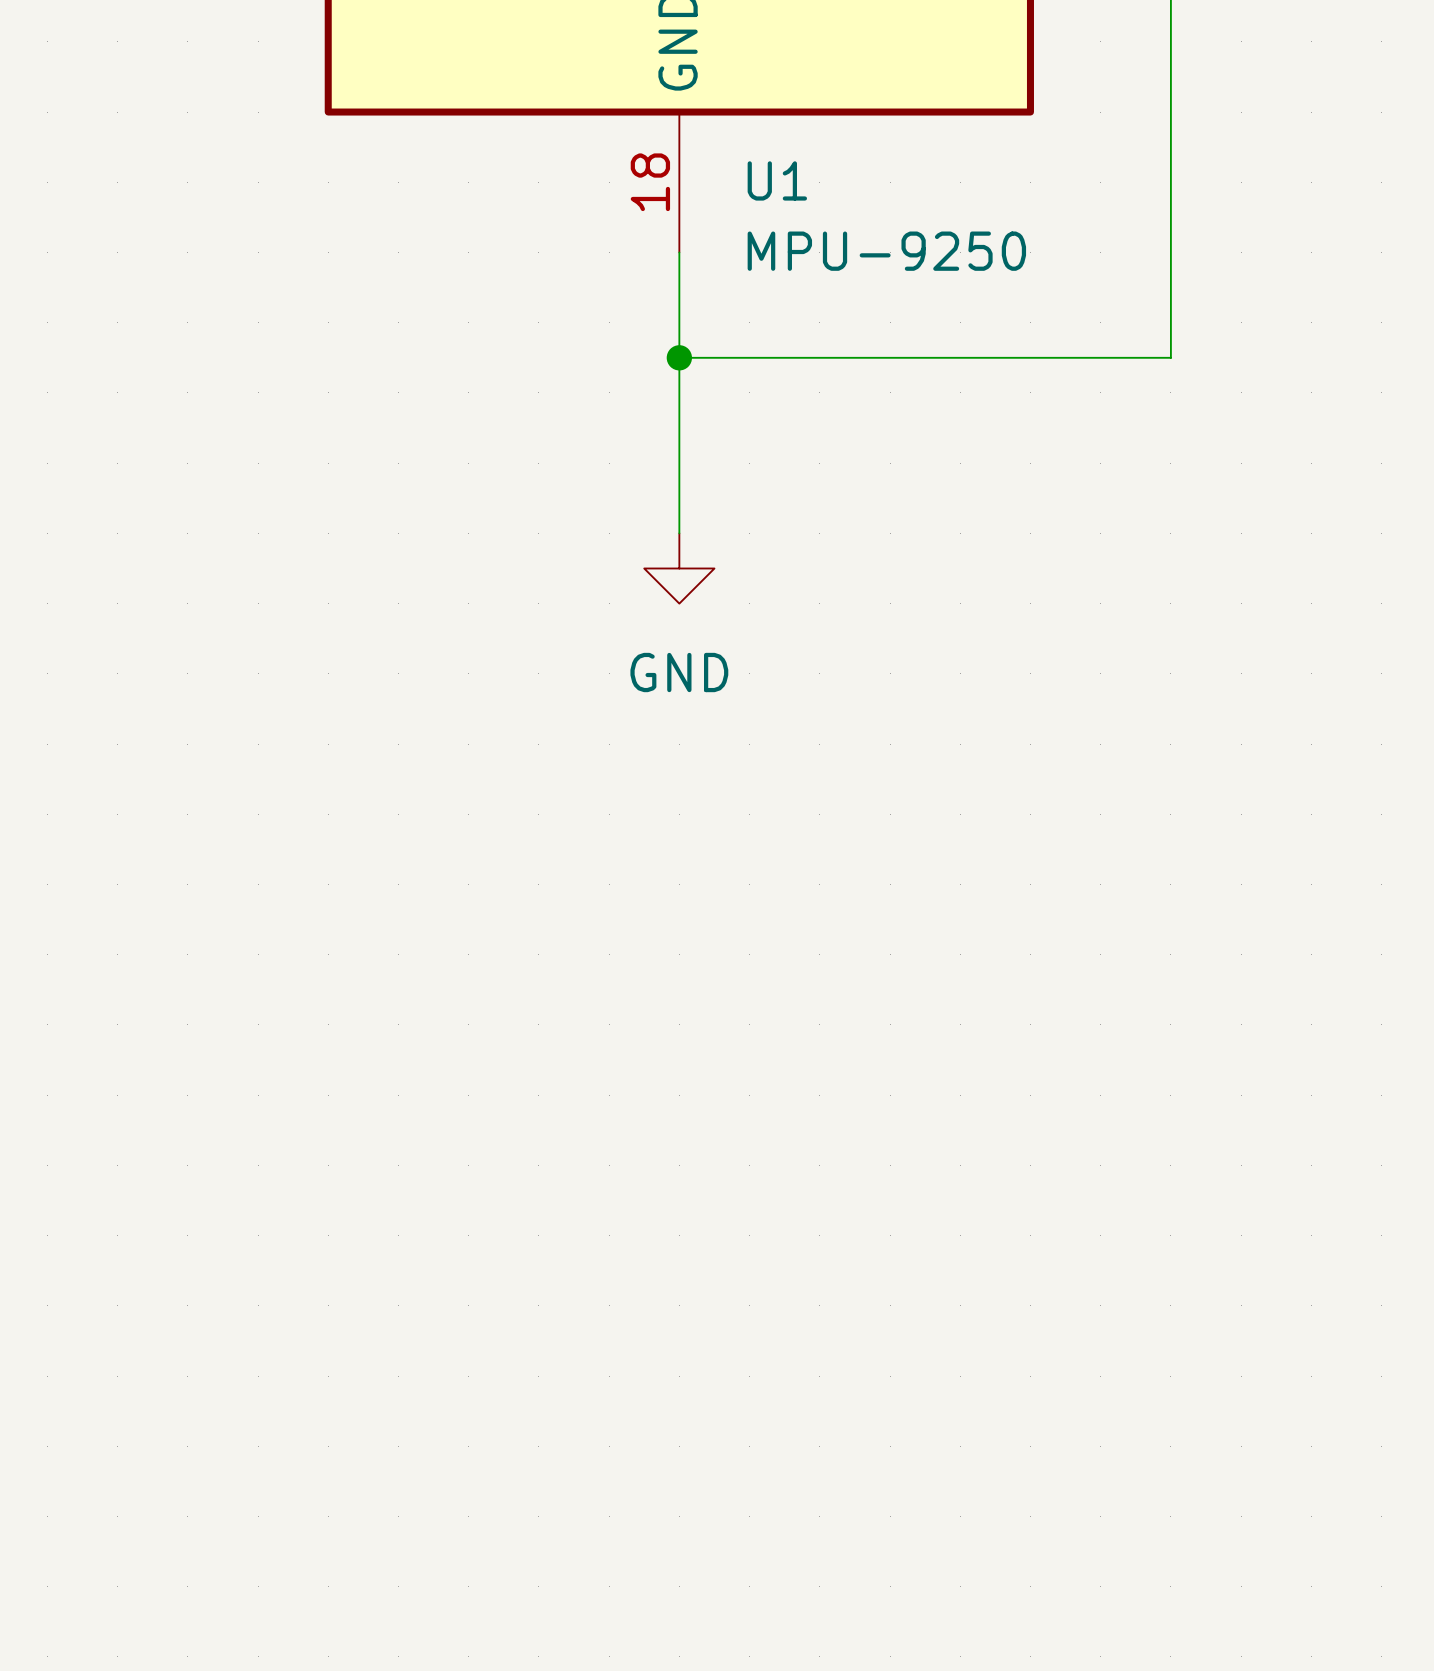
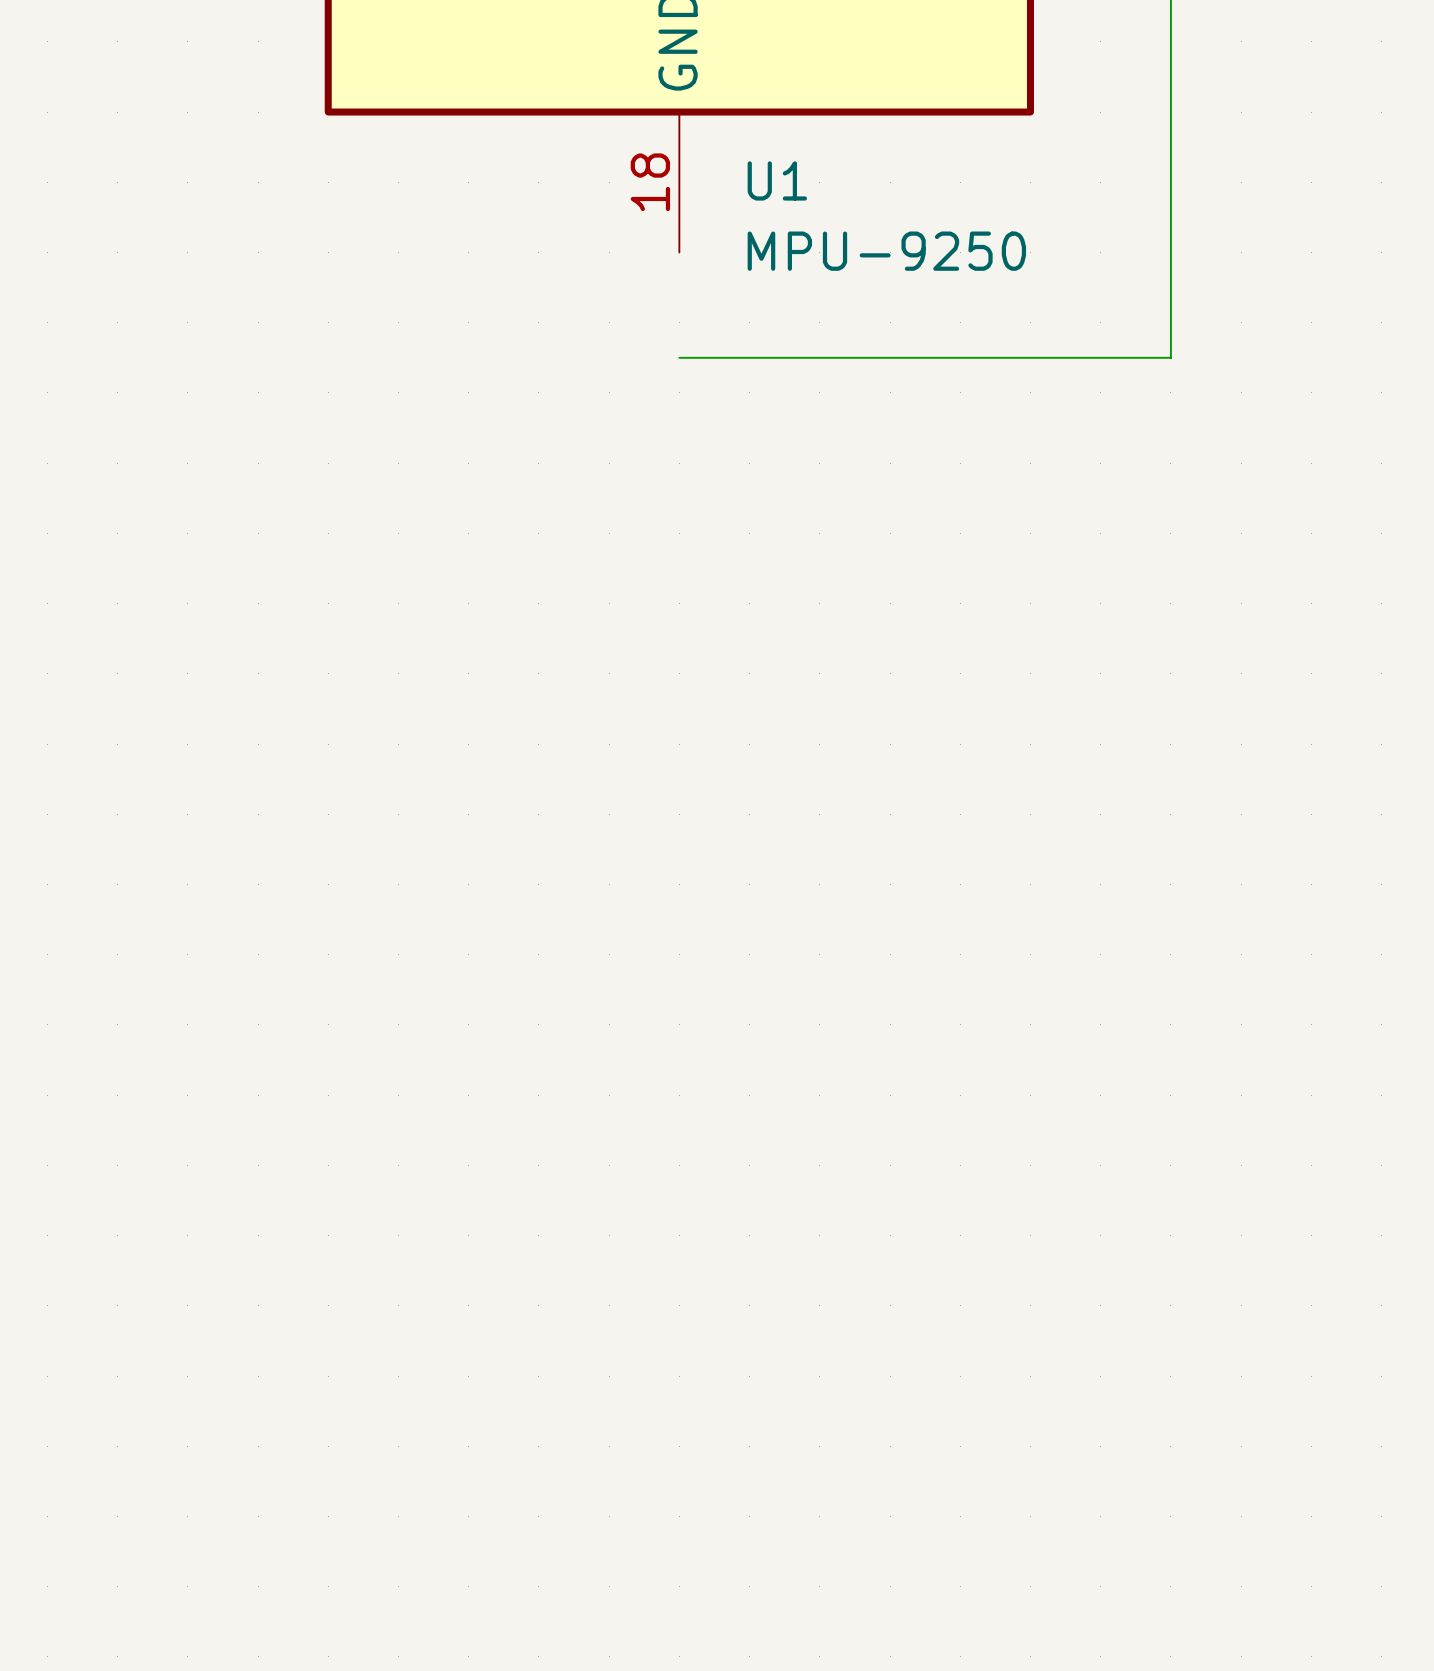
wire: (679, 252) (679, 533) -> none
junction: (679, 357) -> none
power symbol: GND (679, 568) -> none

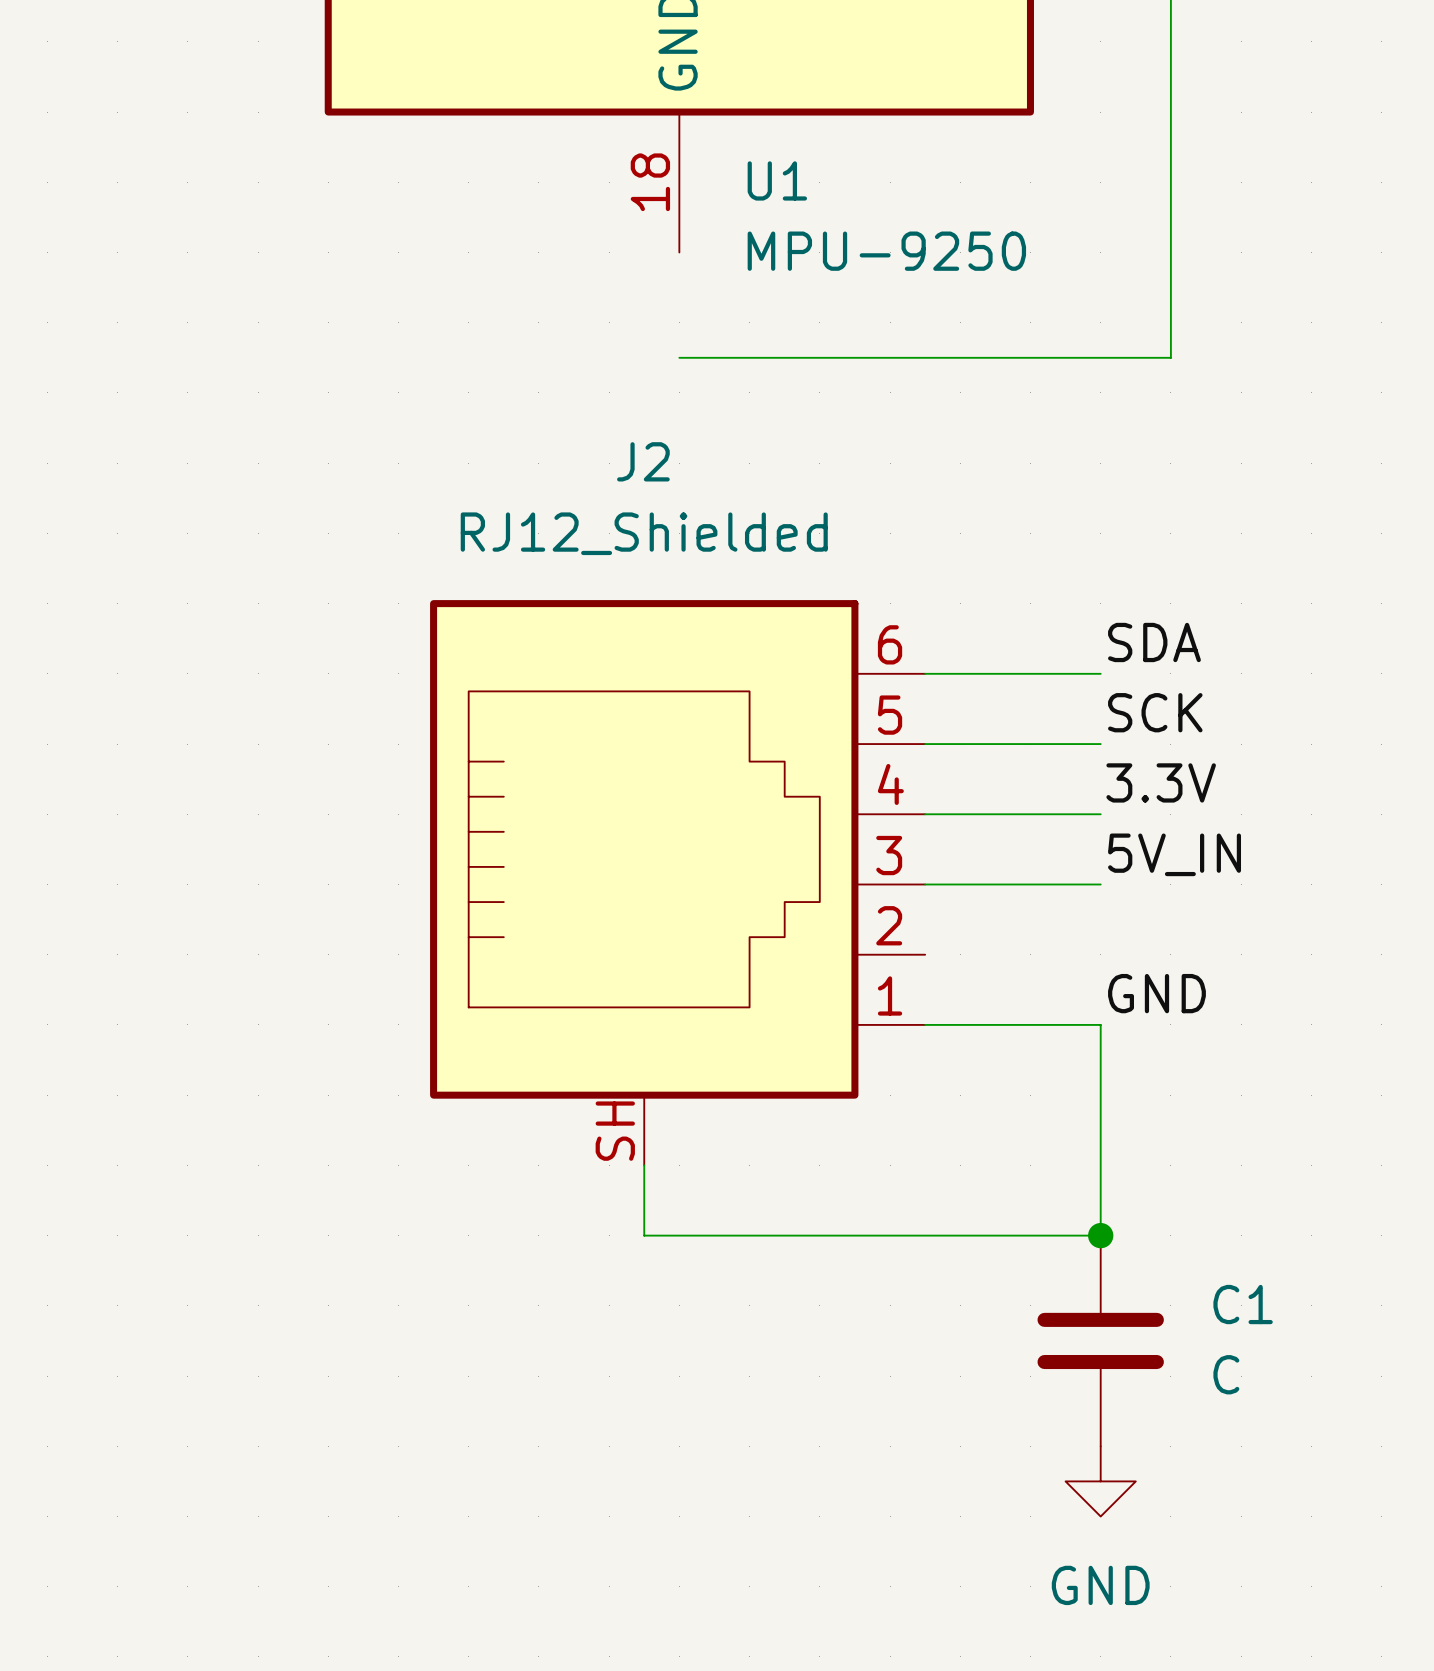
label: none -> SDA (1154, 642)
wire: none -> (925, 673) (1100, 673)
label: none -> SCK (1155, 712)
wire: none -> (925, 744) (1100, 744)
label: none -> 3.3V (1161, 782)
wire: none -> (925, 814) (1100, 814)
label: none -> 5V_IN (1174, 854)
J2: none -> RJ12_Shielded (677, 882)
wire: none -> (925, 884) (1100, 884)
label: none -> GND (1156, 993)
wire: none -> (925, 1024) (1100, 1024) (1100, 1235) (644, 1235) (644, 1165)
junction: none -> (1100, 1235)
C1: none -> C (1100, 1340)
power symbol: none -> GND (1100, 1481)

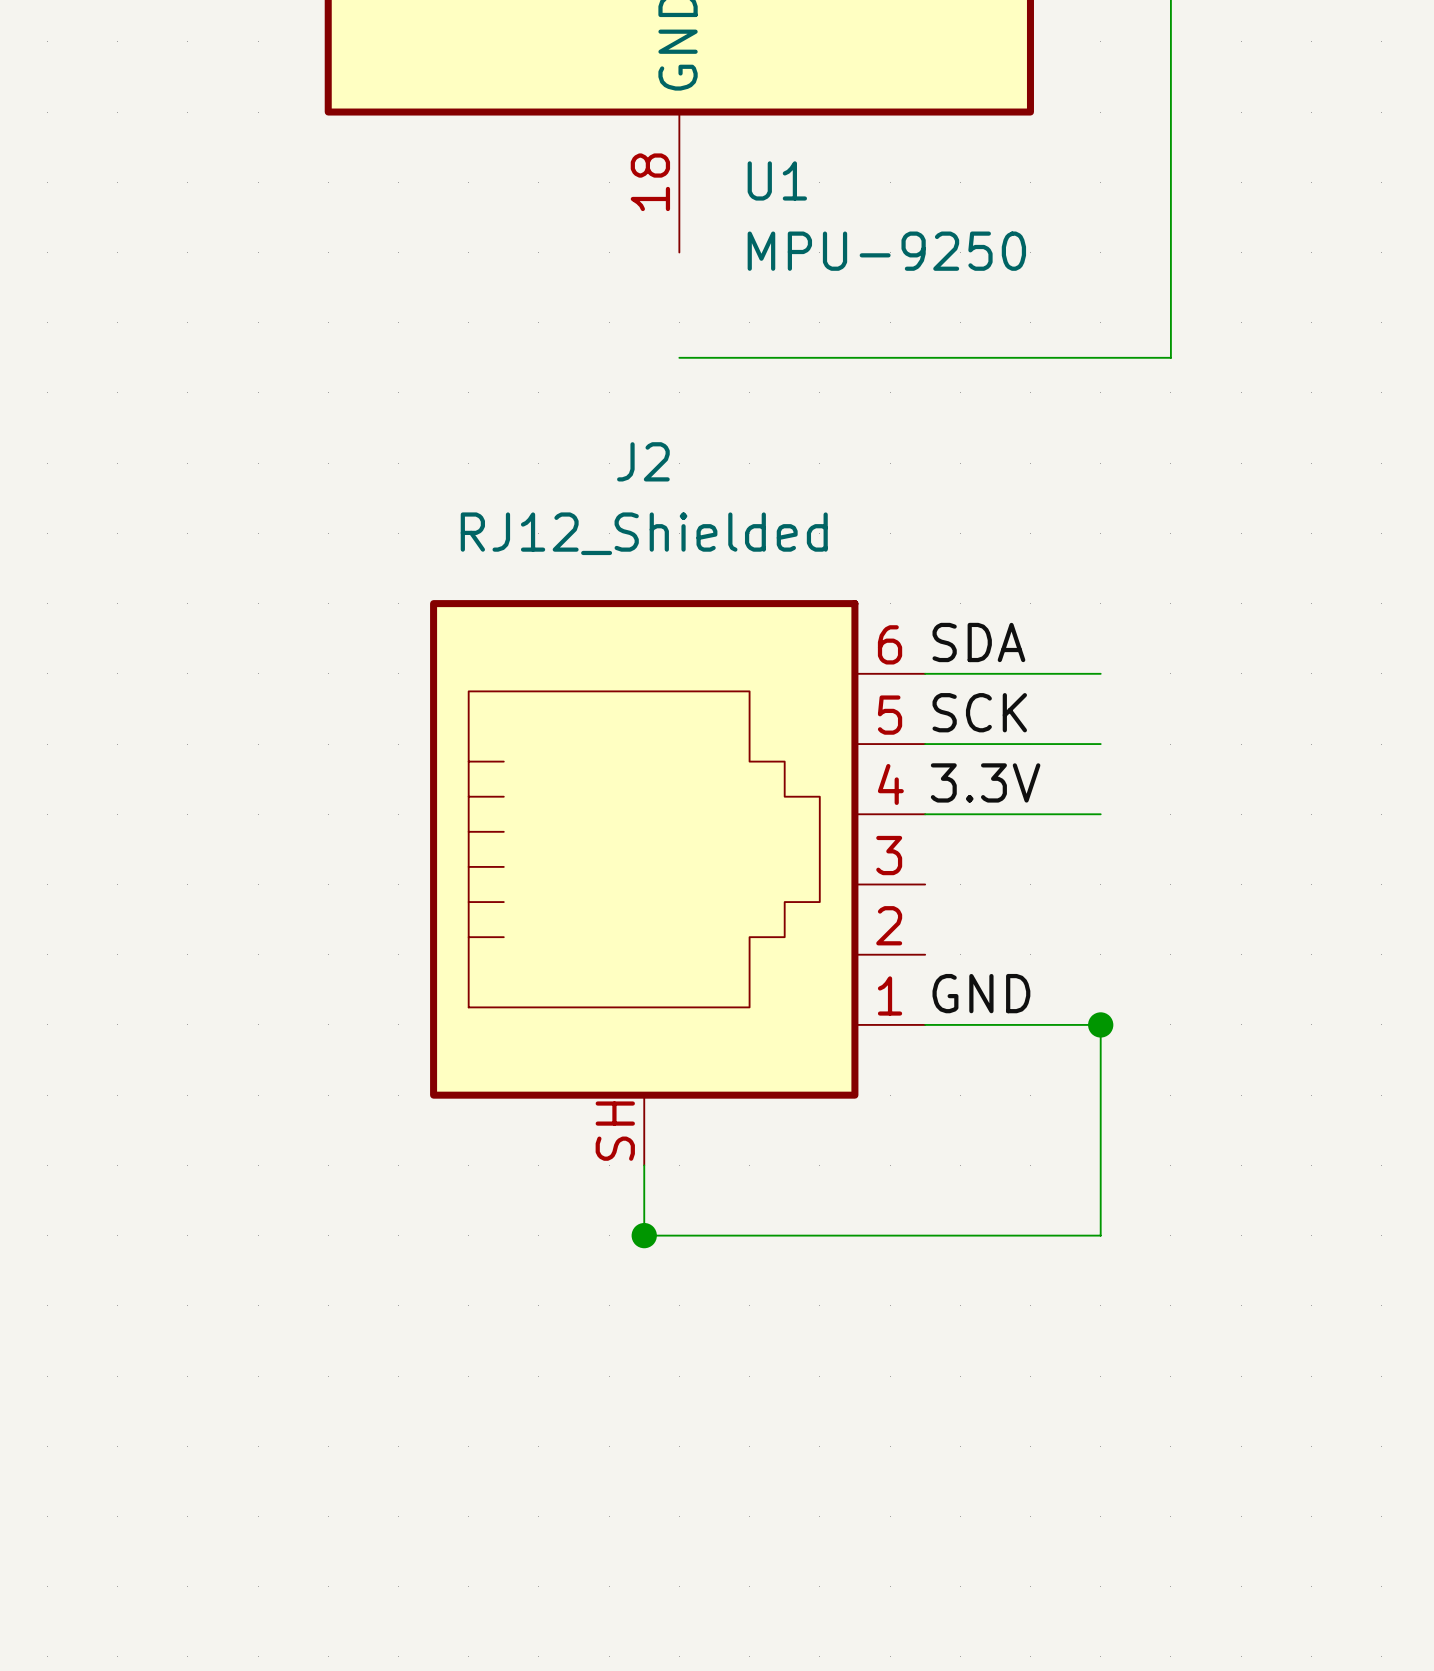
label position: SDA (1154, 642) -> SDA (978, 642)
label position: SCK (1155, 712) -> SCK (979, 712)
label position: 3.3V (1161, 782) -> 3.3V (985, 782)
label: 5V_IN (1174, 854) -> none
wire: (925, 884) (1100, 884) -> none
label position: GND (1156, 993) -> GND (981, 993)
junction: none -> (1100, 1024)
junction: none -> (644, 1235)
junction: (1100, 1235) -> none
C1: C (1100, 1340) -> none
power symbol: GND (1100, 1481) -> none

